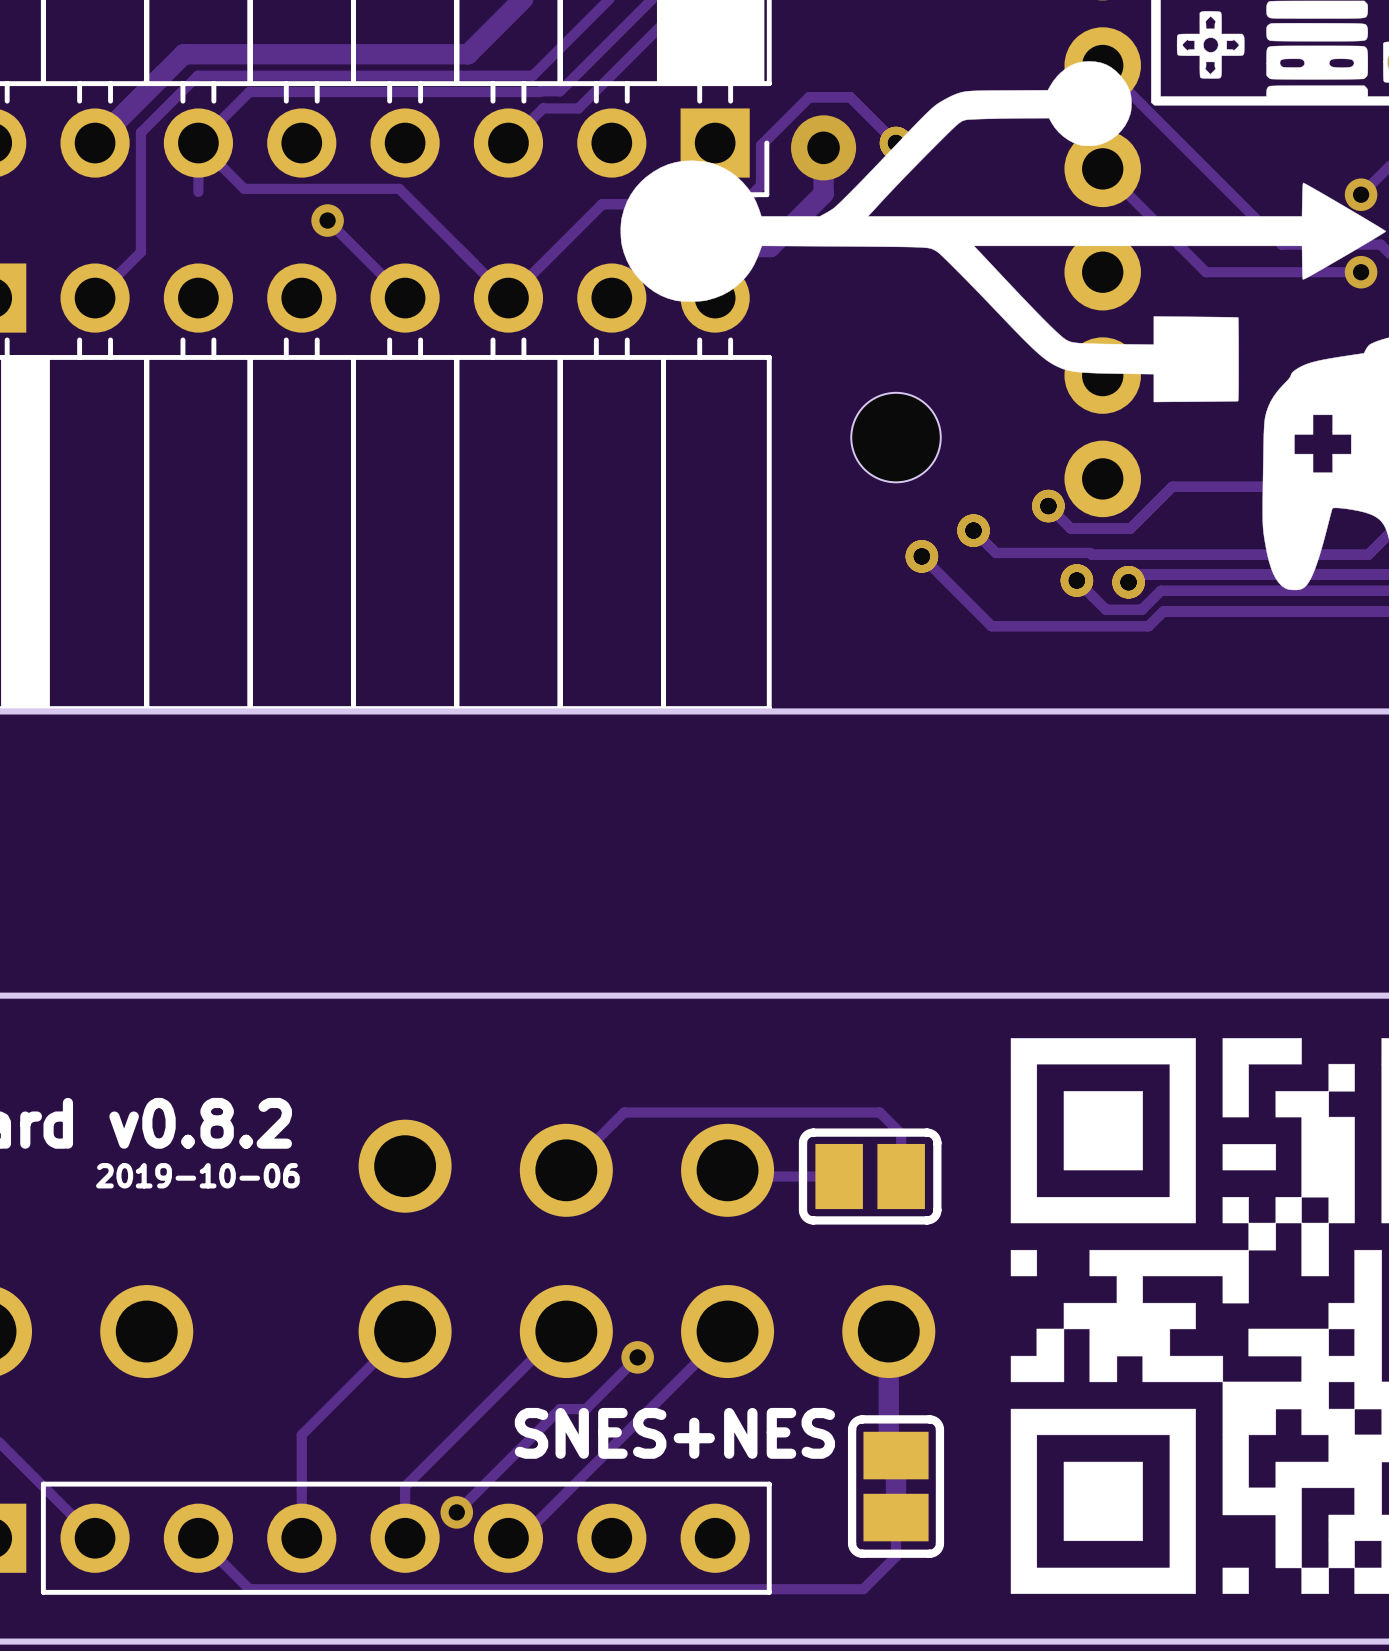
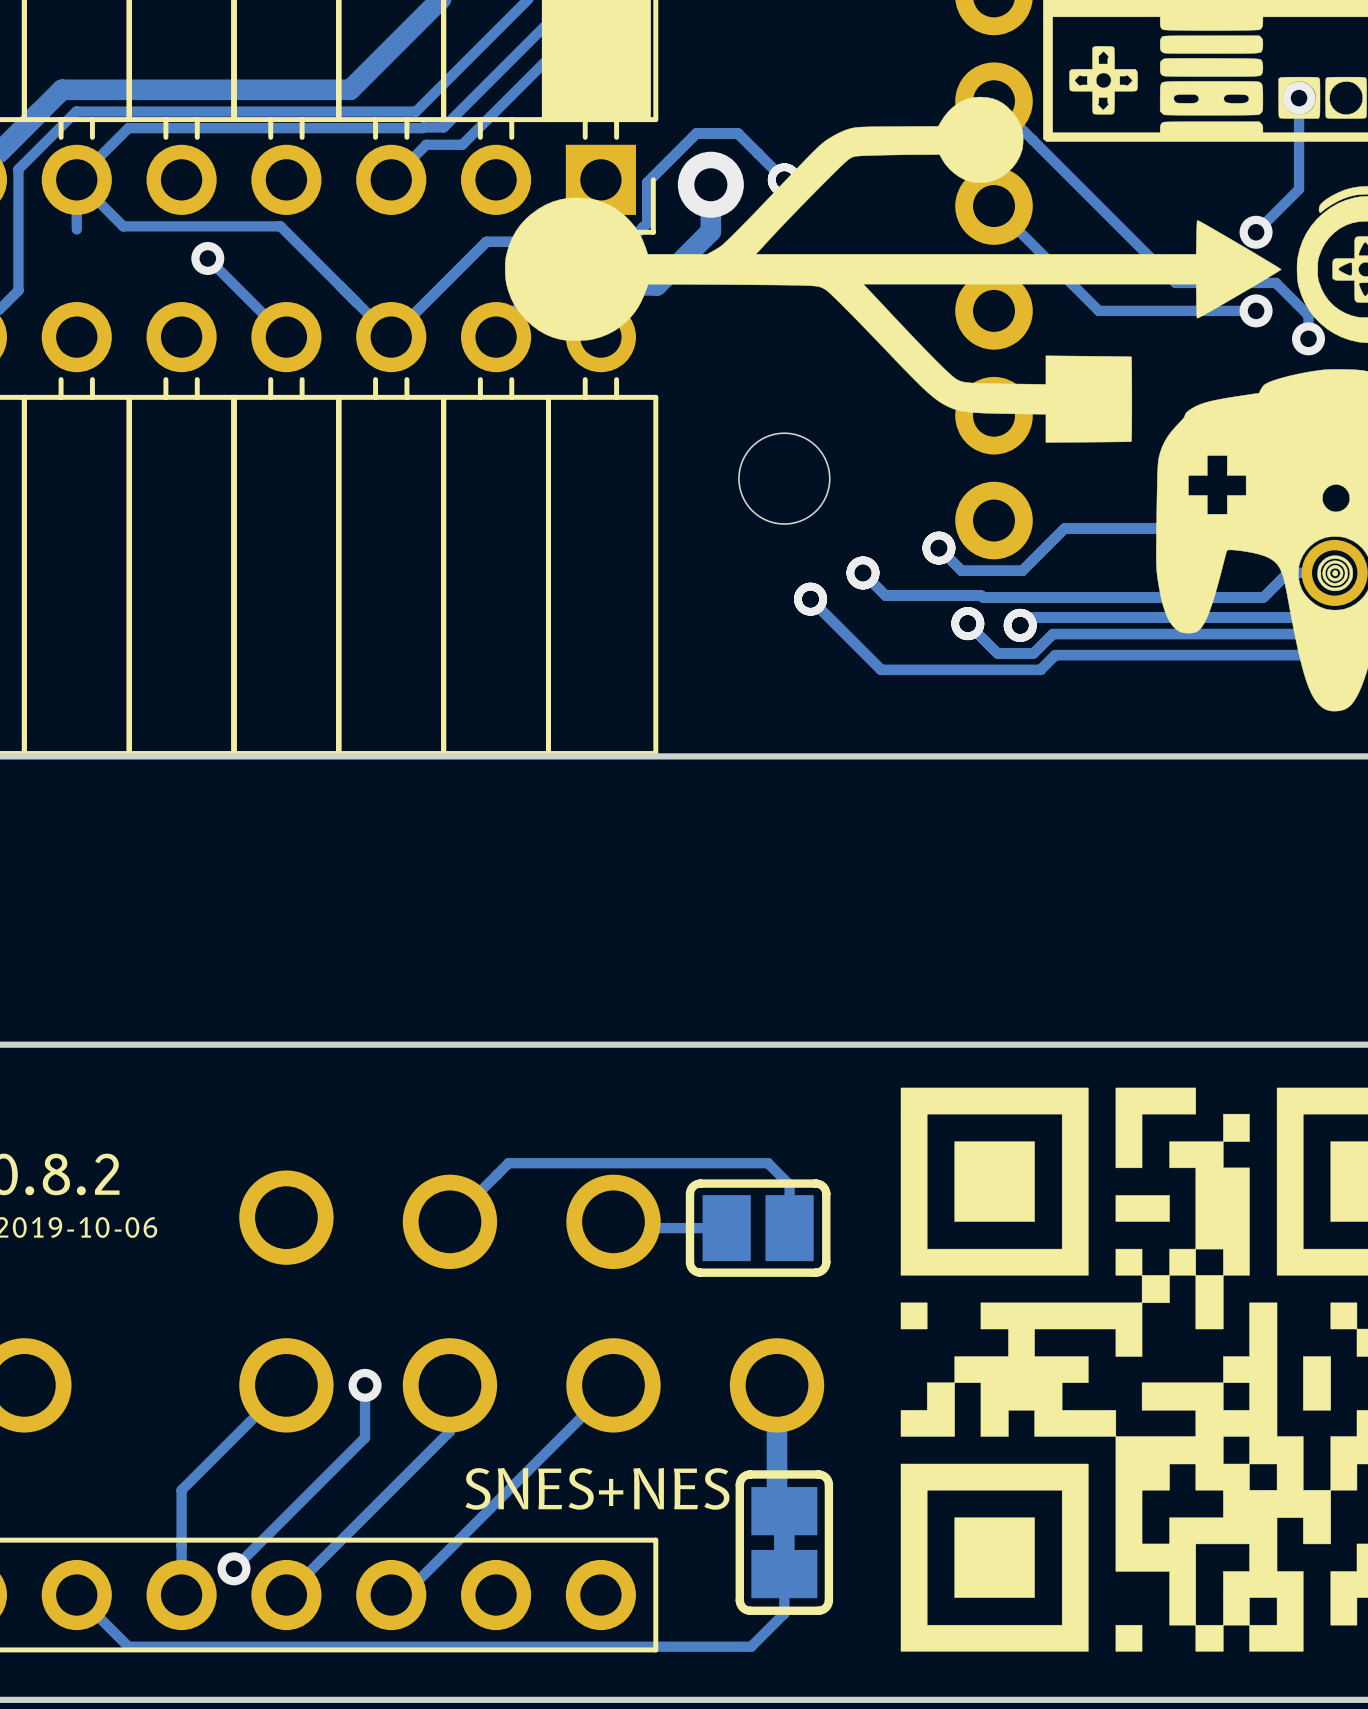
track: none -> (365, 1385) (365, 1437) (234, 1568)
via: none -> (365, 1385)
track: (566, 1331) (560, 1331) (405, 1486) (405, 1538) -> (449, 1385) (449, 1431) (286, 1595)
track: (637, 1357) (585, 1409) (560, 1409) (456, 1512) -> none
via: (637, 1357) -> none
via: none -> (234, 1568)
via: (456, 1512) -> none

